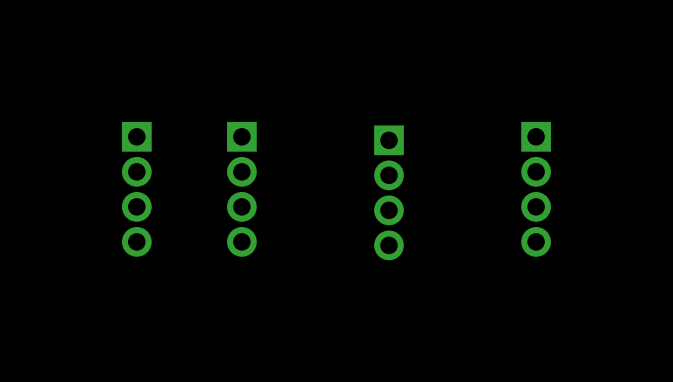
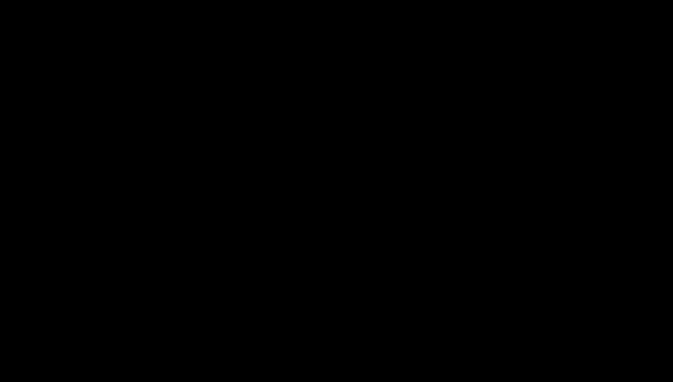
part: (136, 189) -> none
part: (241, 189) -> none
part: (536, 189) -> none
part: (388, 192) -> none

